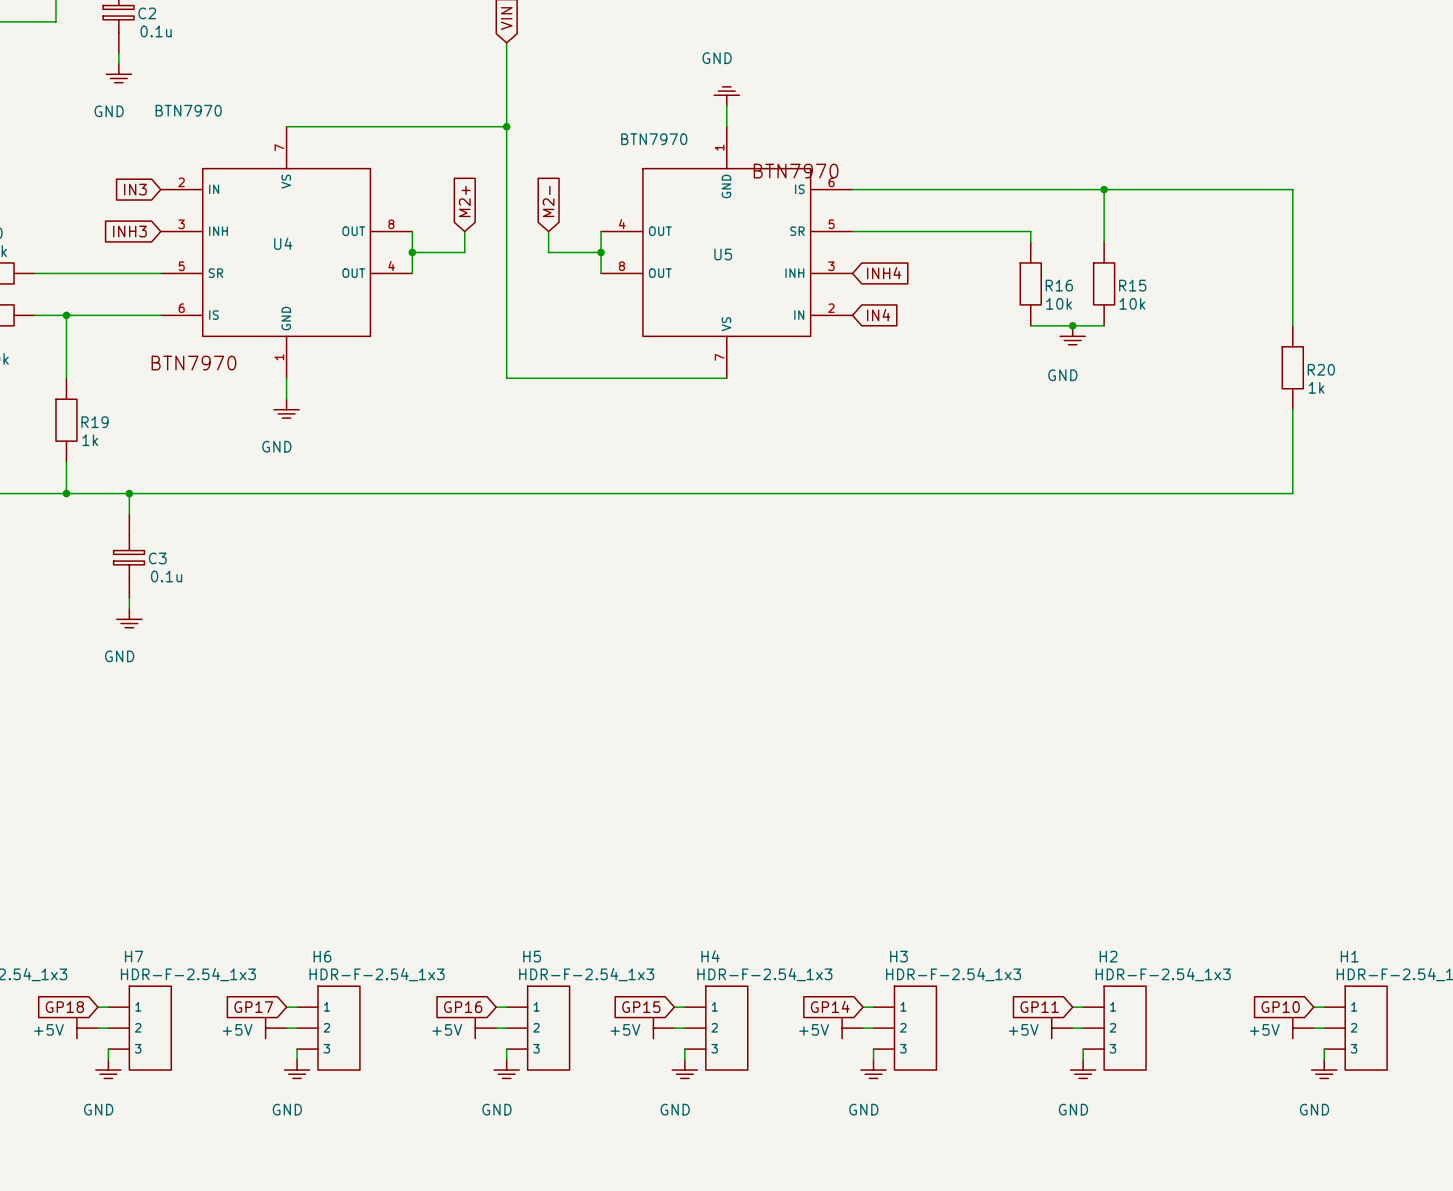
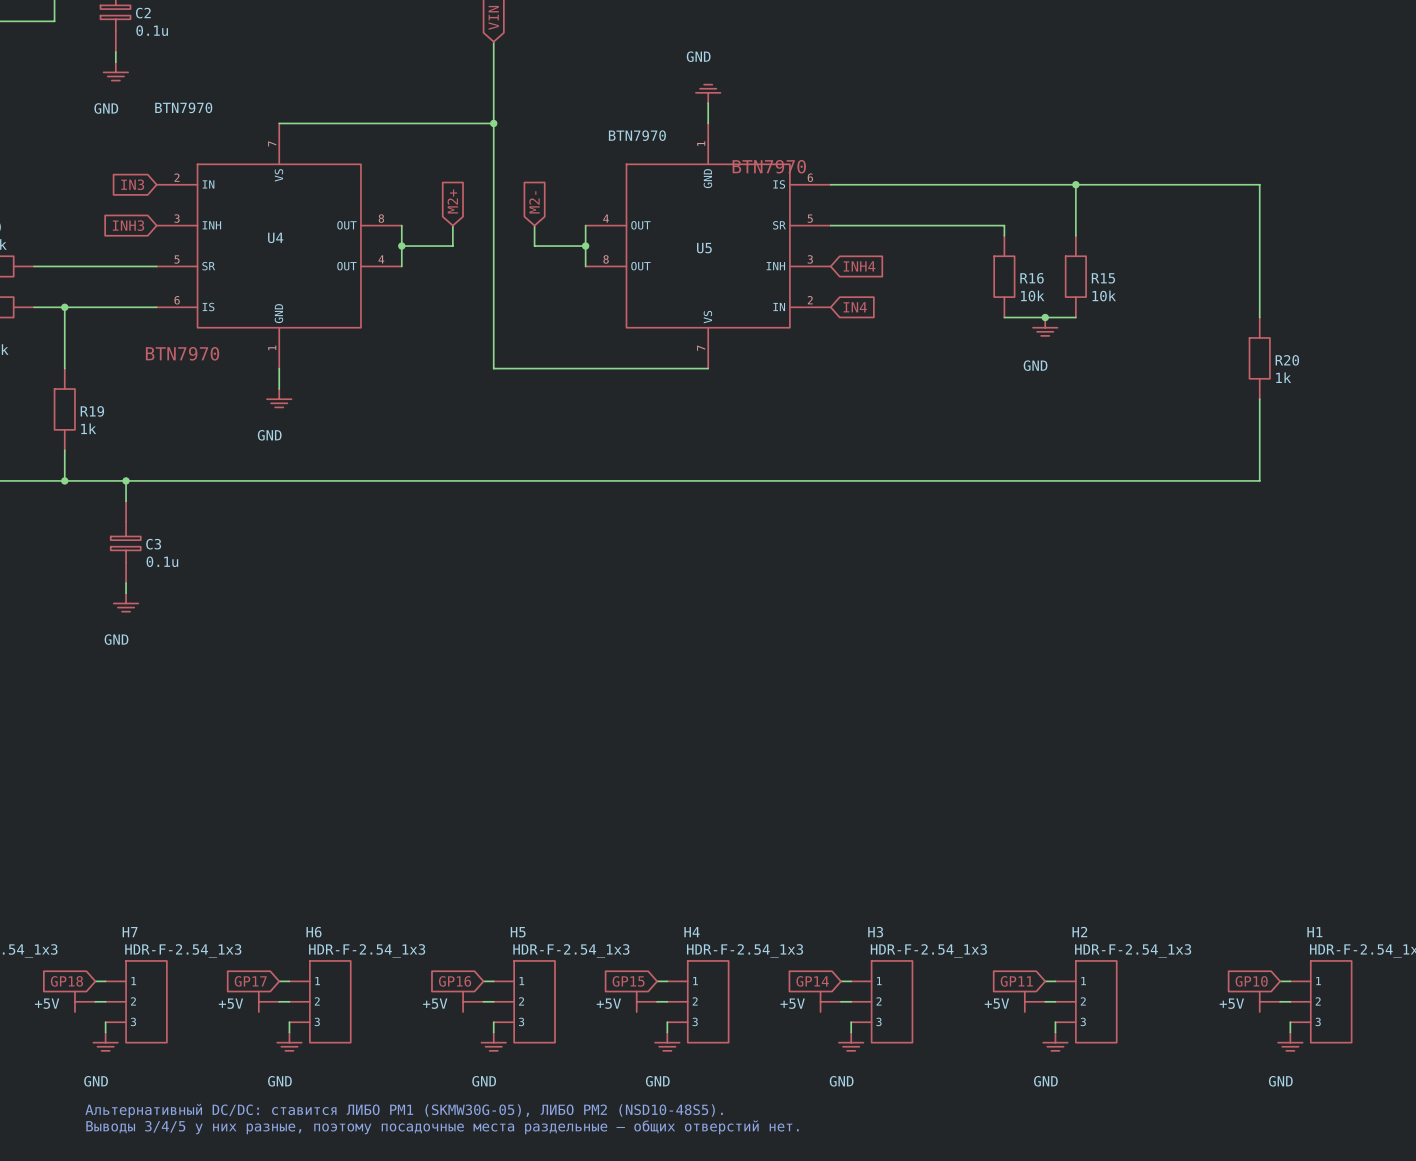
text: none -> Альтернативный DC/DC: ставится ЛИБО PM1 (SKMW30G-05), ЛИБО PM2 (NSD10-48S5). (404, 1110)
text: none -> Выводы 3/4/5 у них разные, поэтому посадочные места раздельные — общих отверстий нет. (442, 1127)

